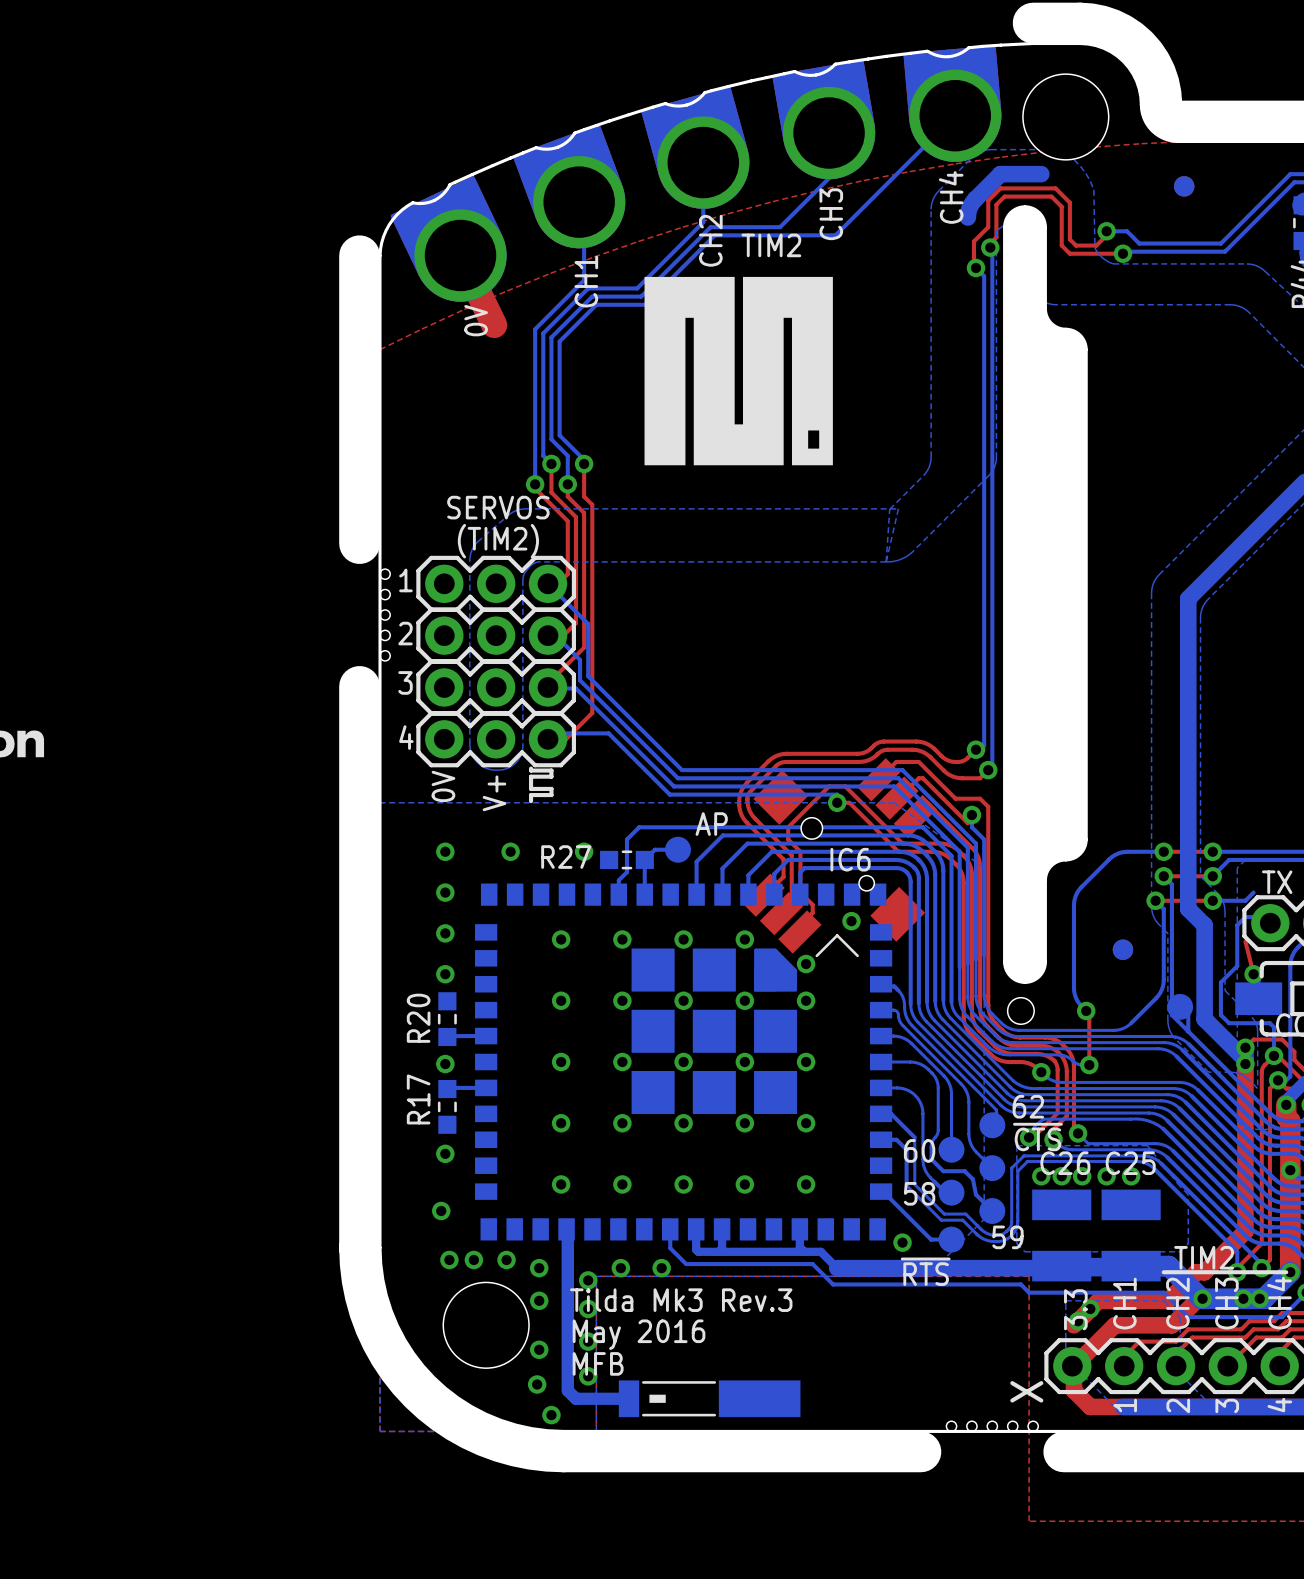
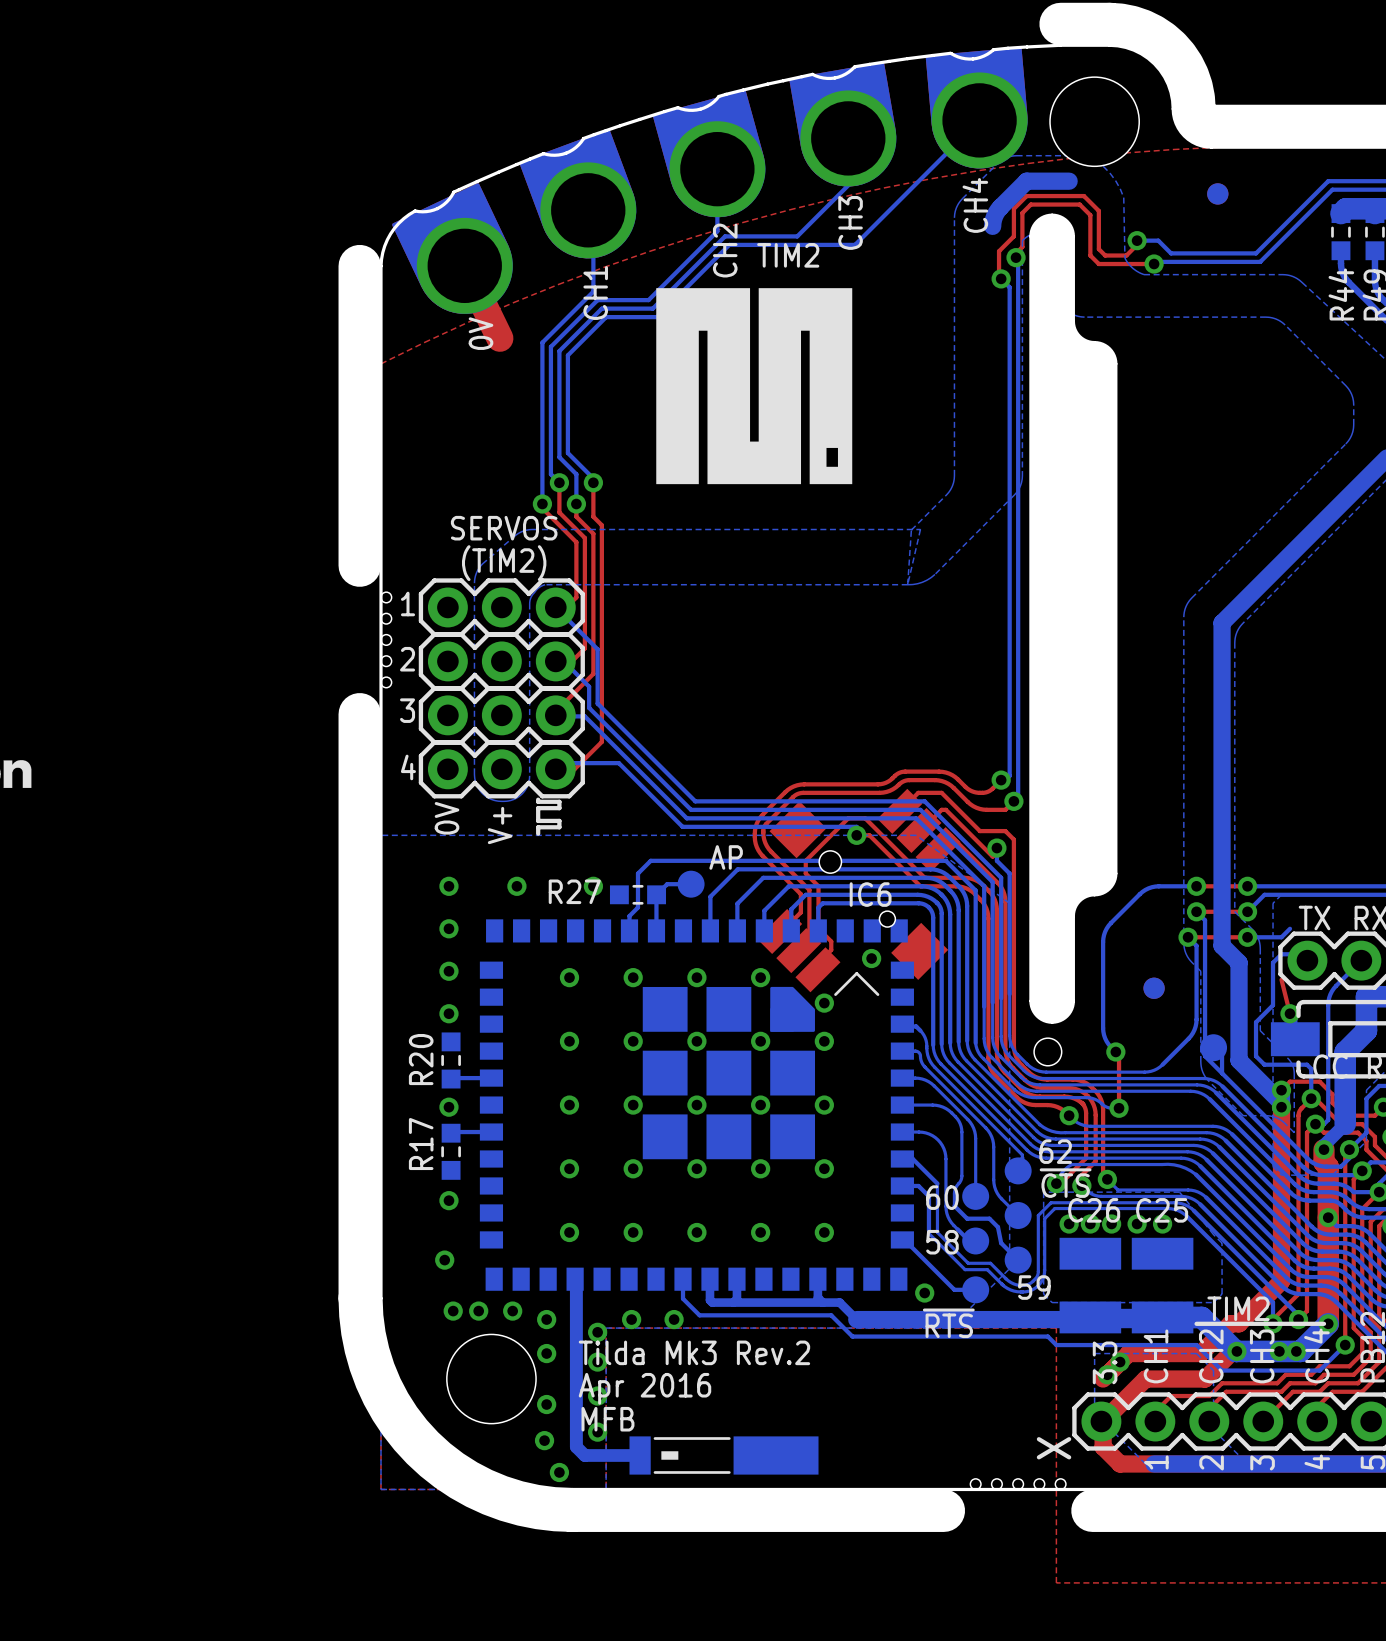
text: Tilda Mk3 Rev.3 (681, 1300) -> Tilda Mk3 Rev.2 (694, 1352)
text: May 2016 (639, 1334) -> Apr 2016 (644, 1388)

